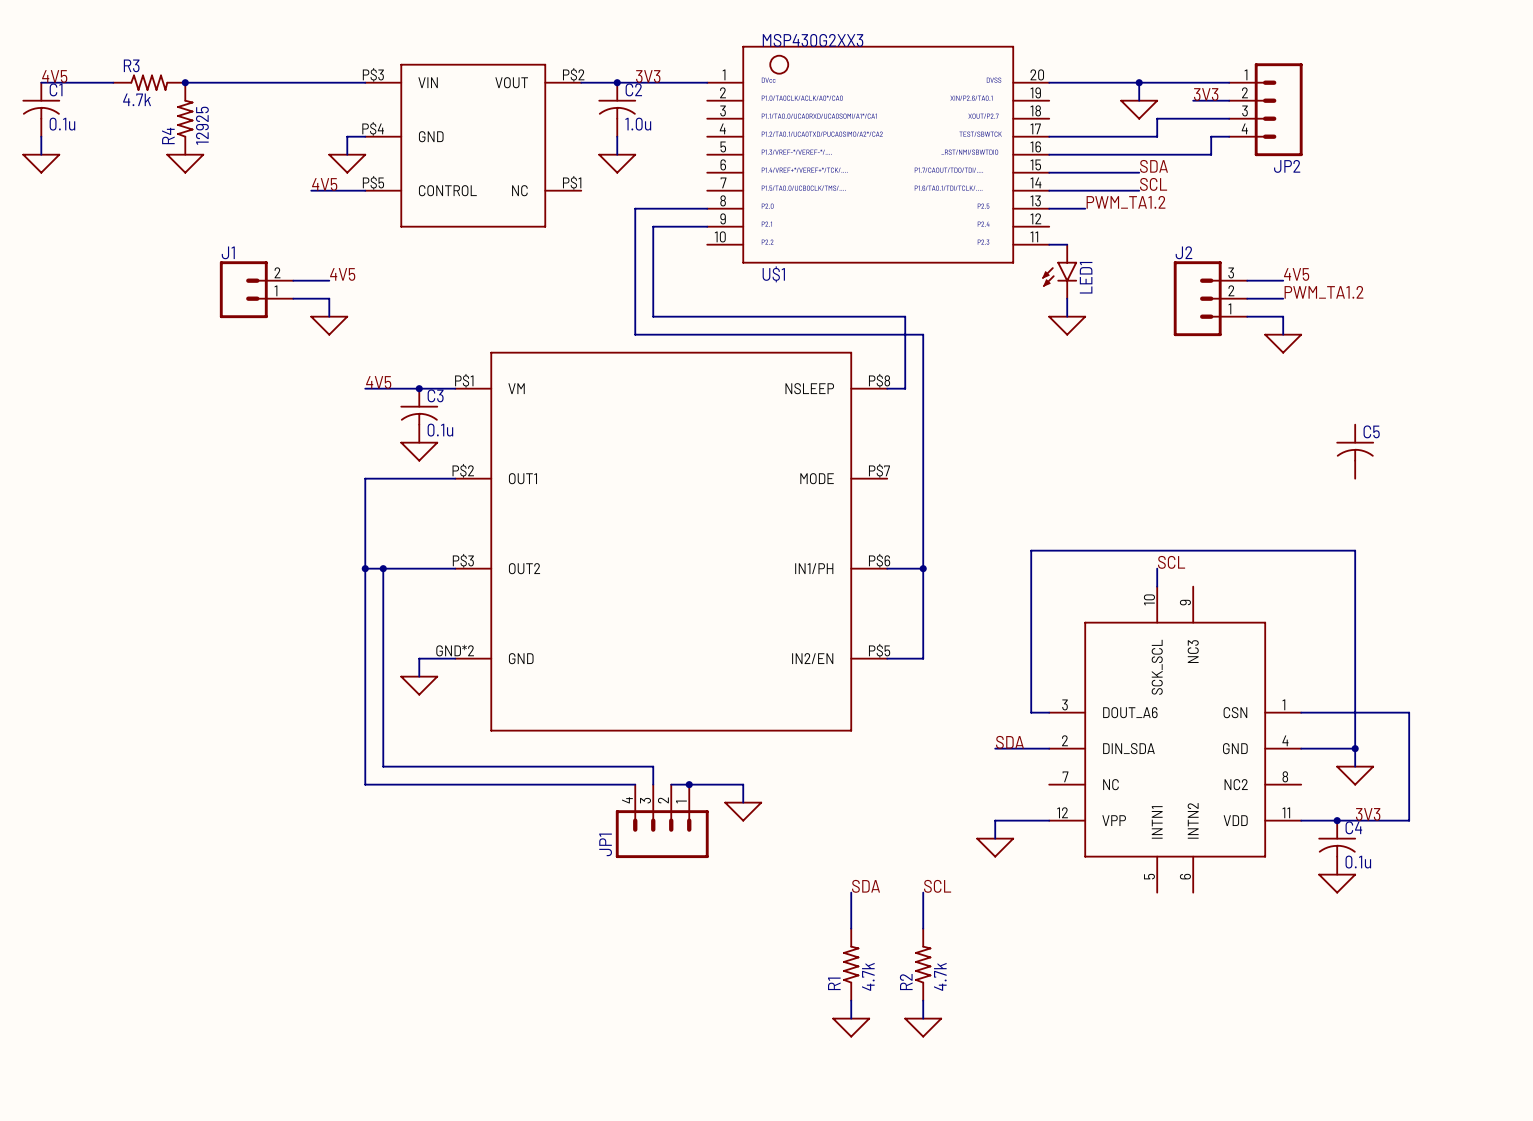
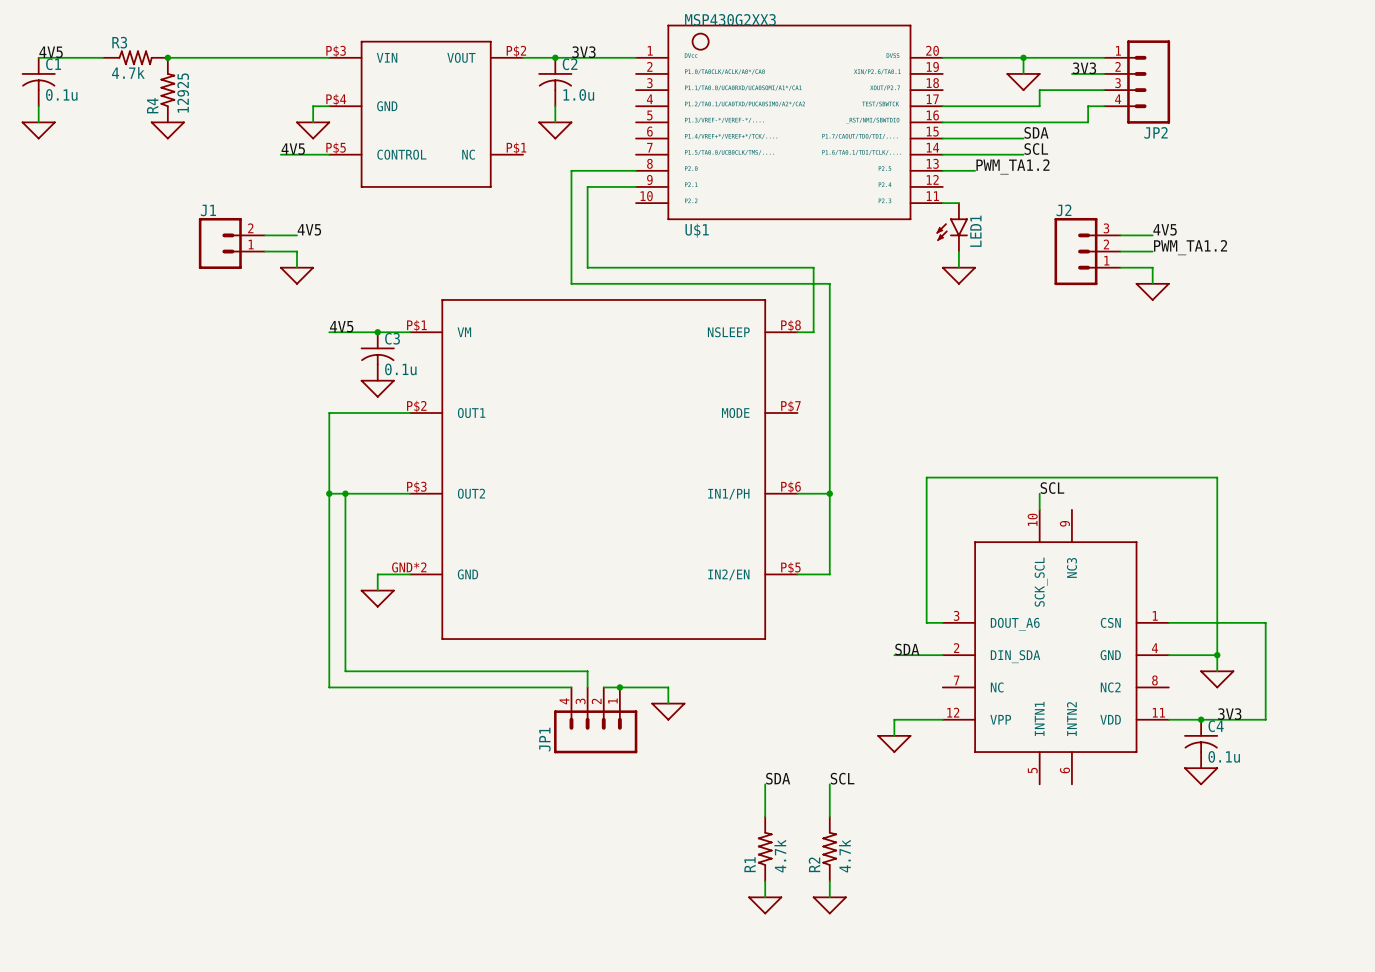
C5: (1355, 451) -> none

